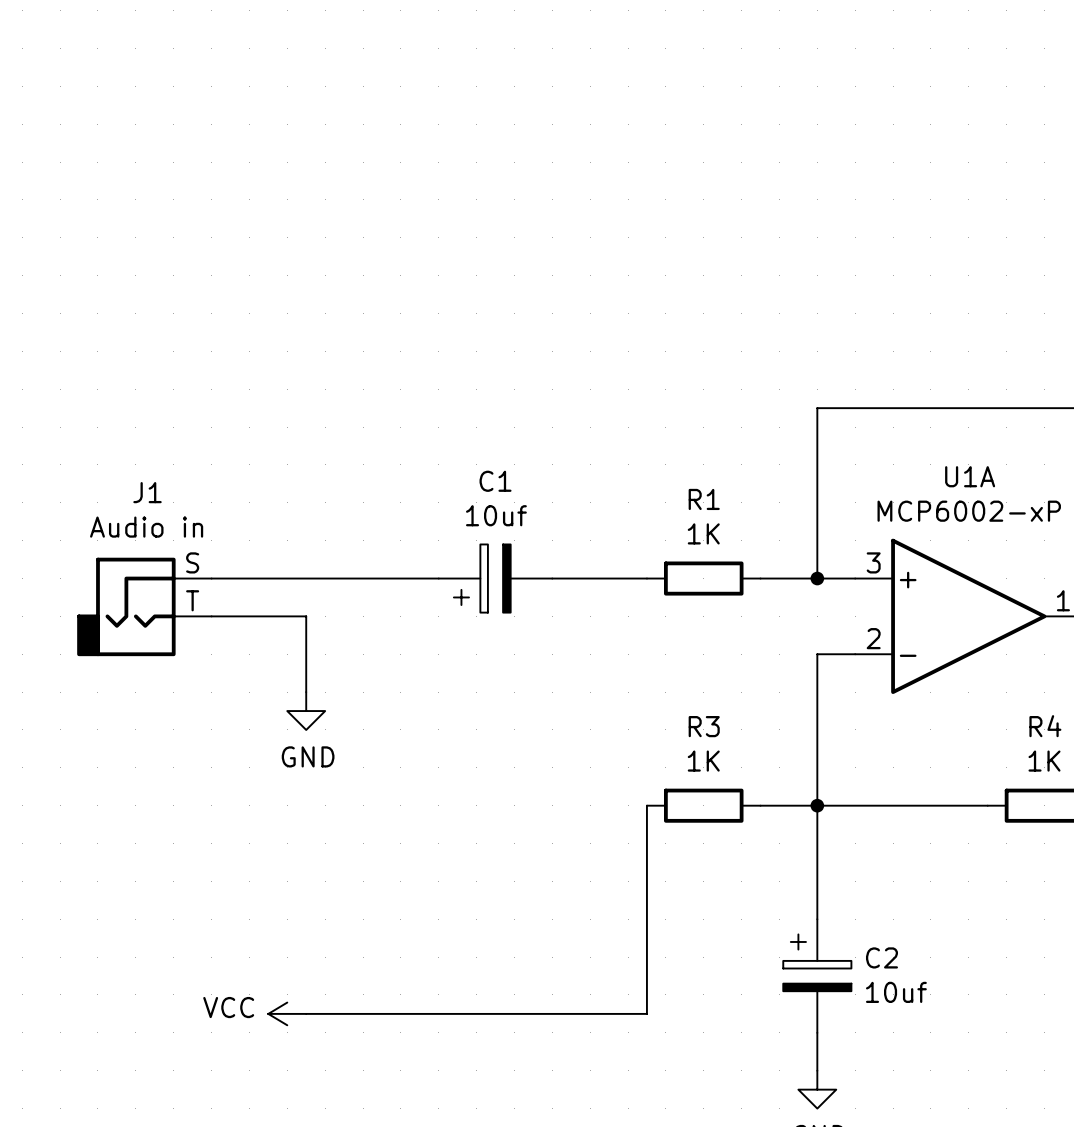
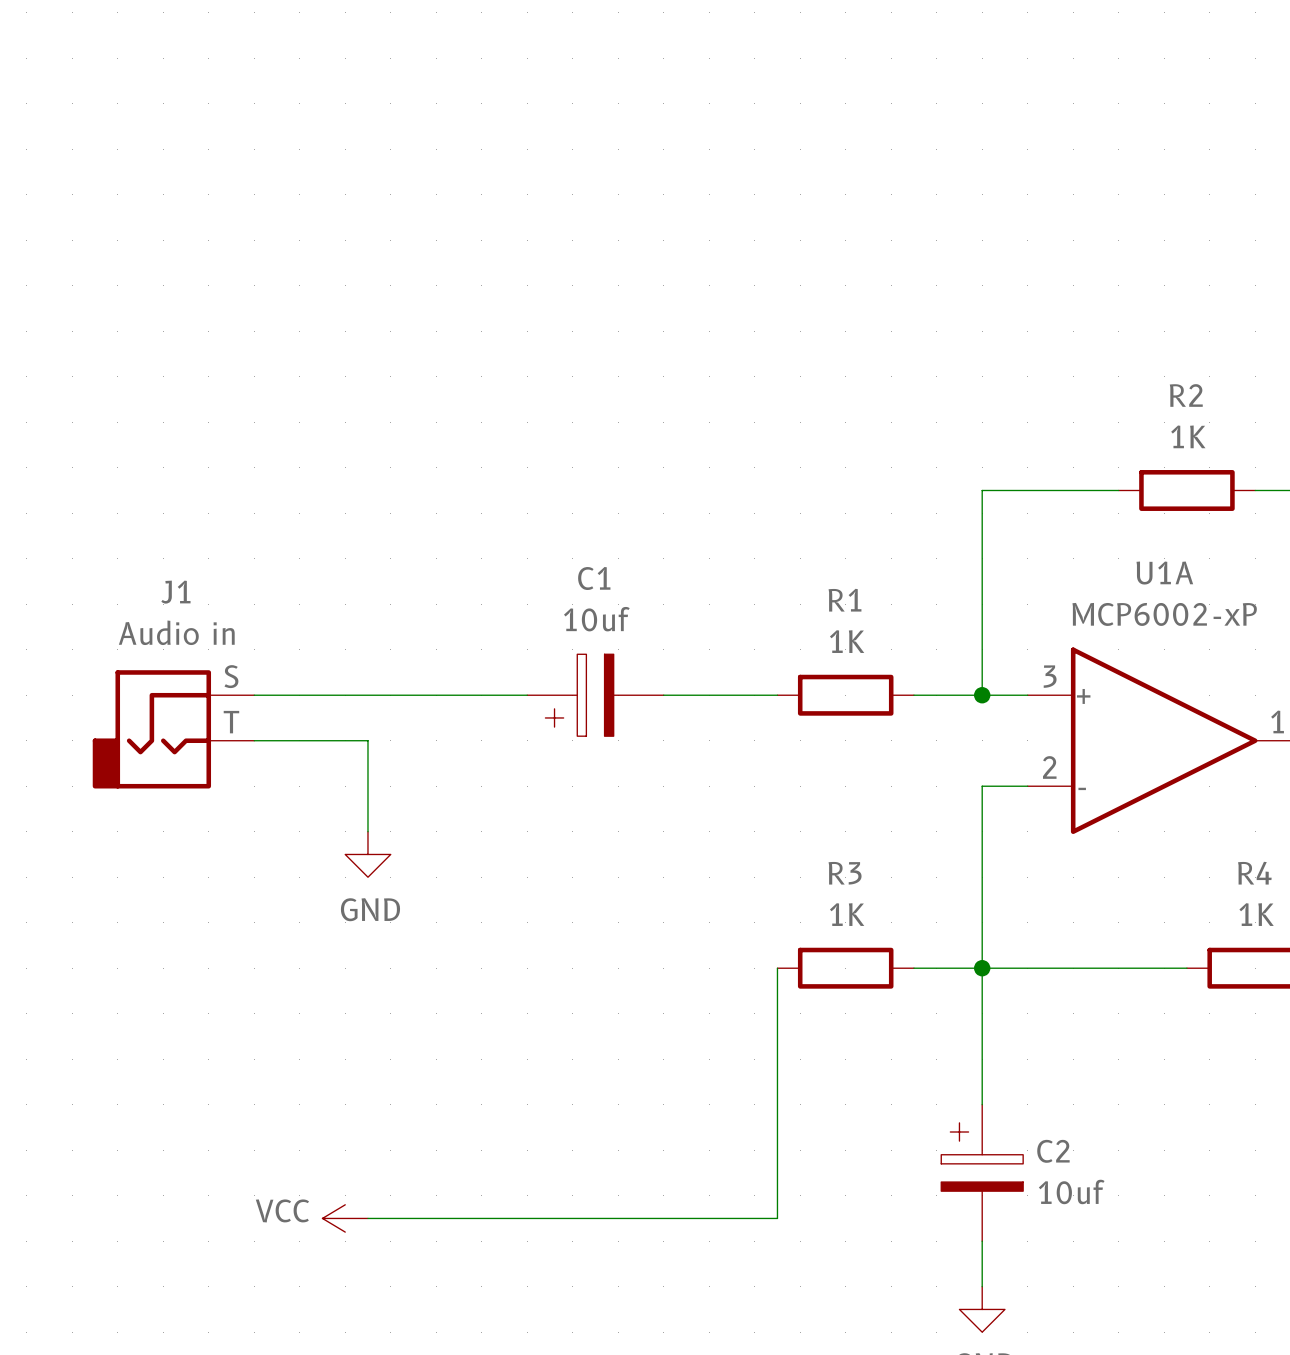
wire: (930, 408) (1044, 408) -> none
R2: none -> 1K (1186, 490)

